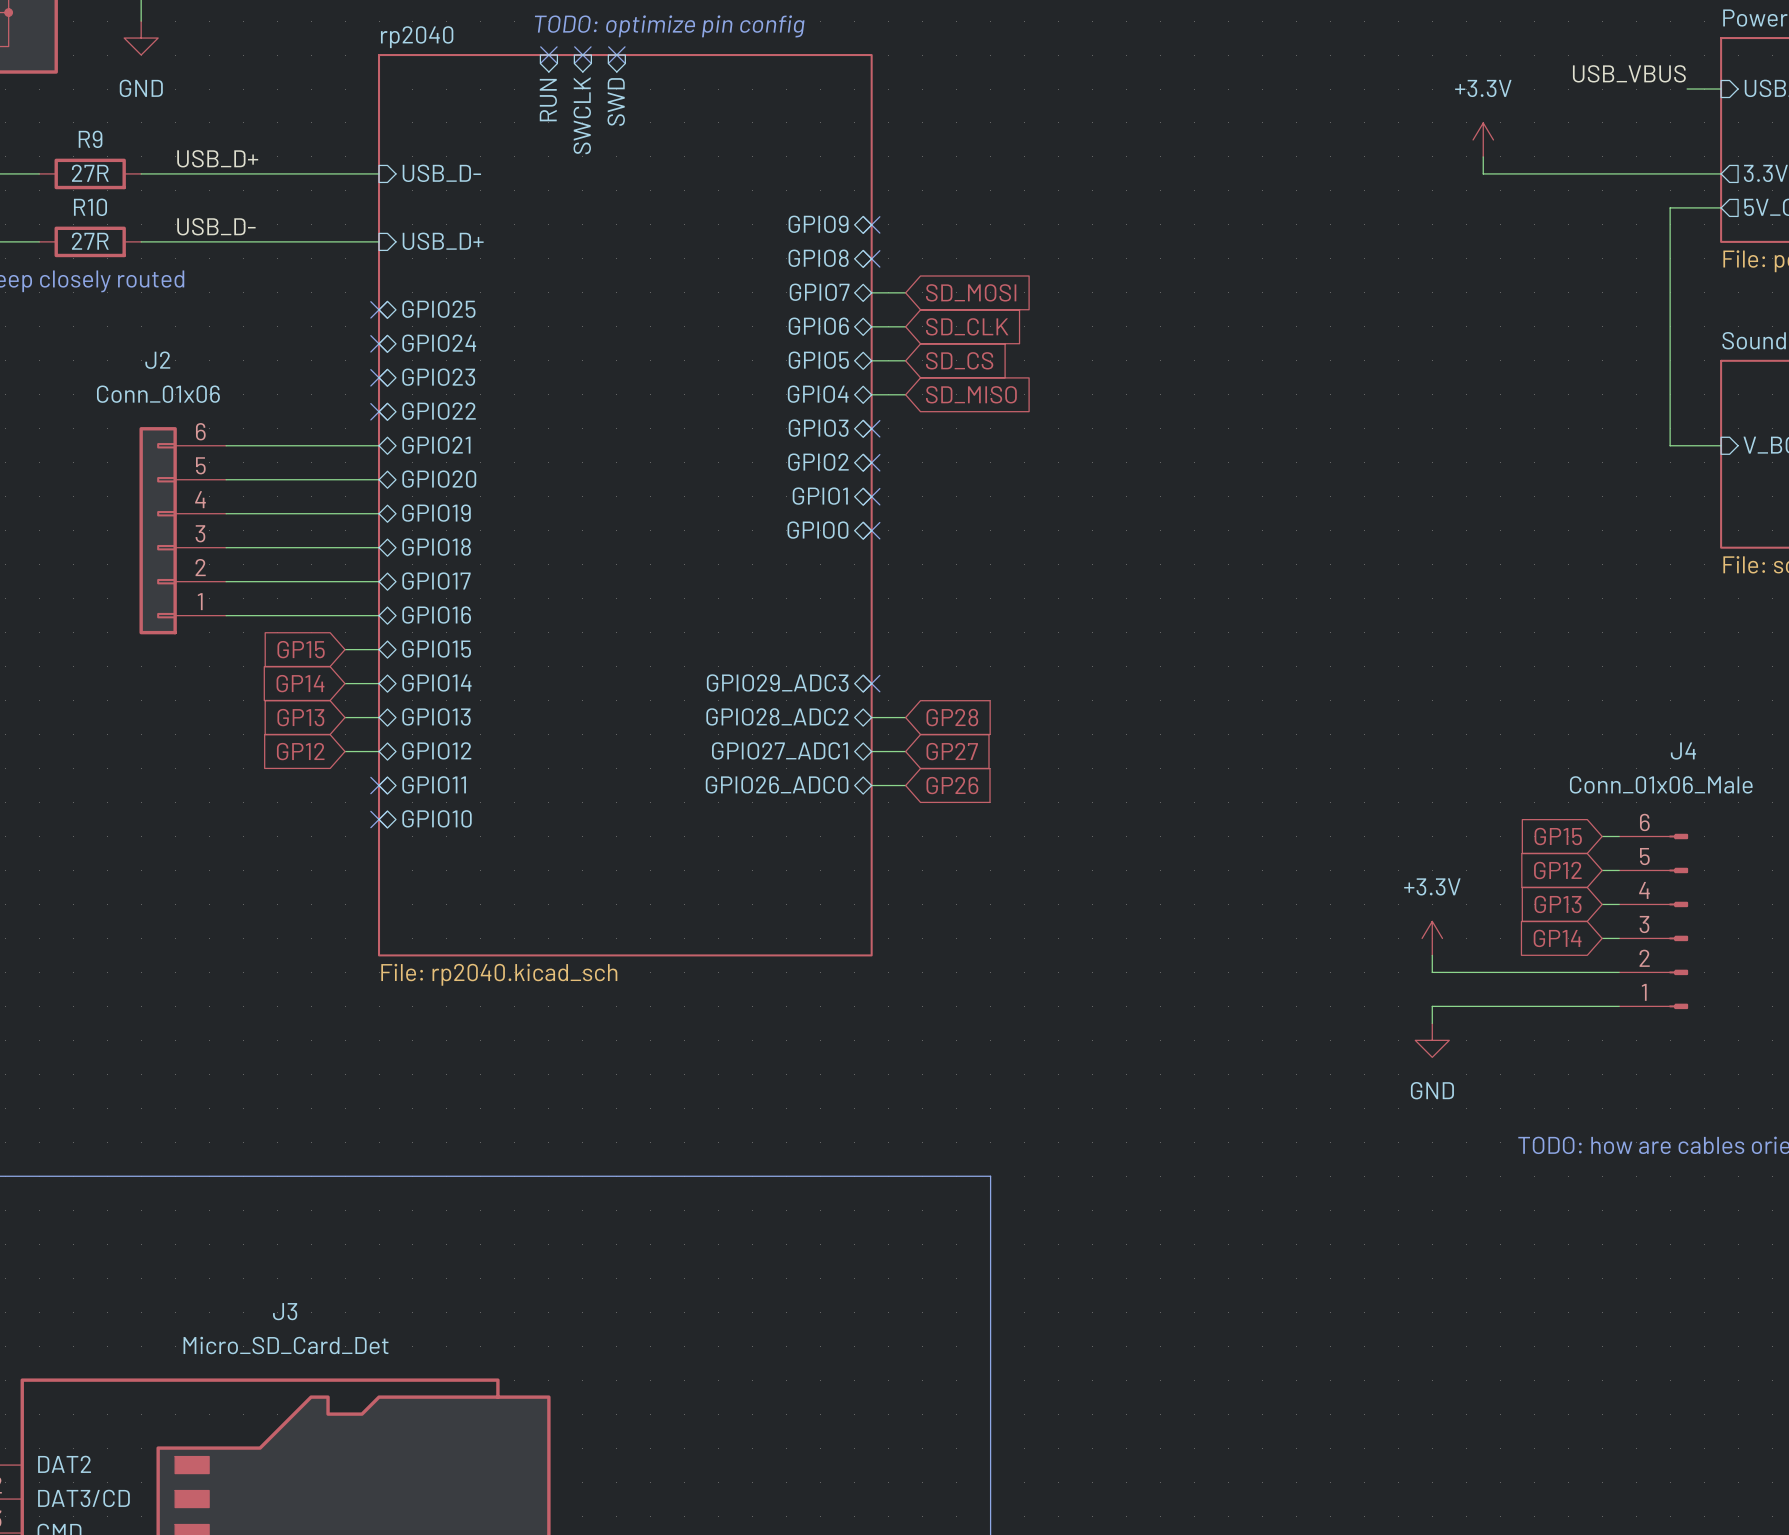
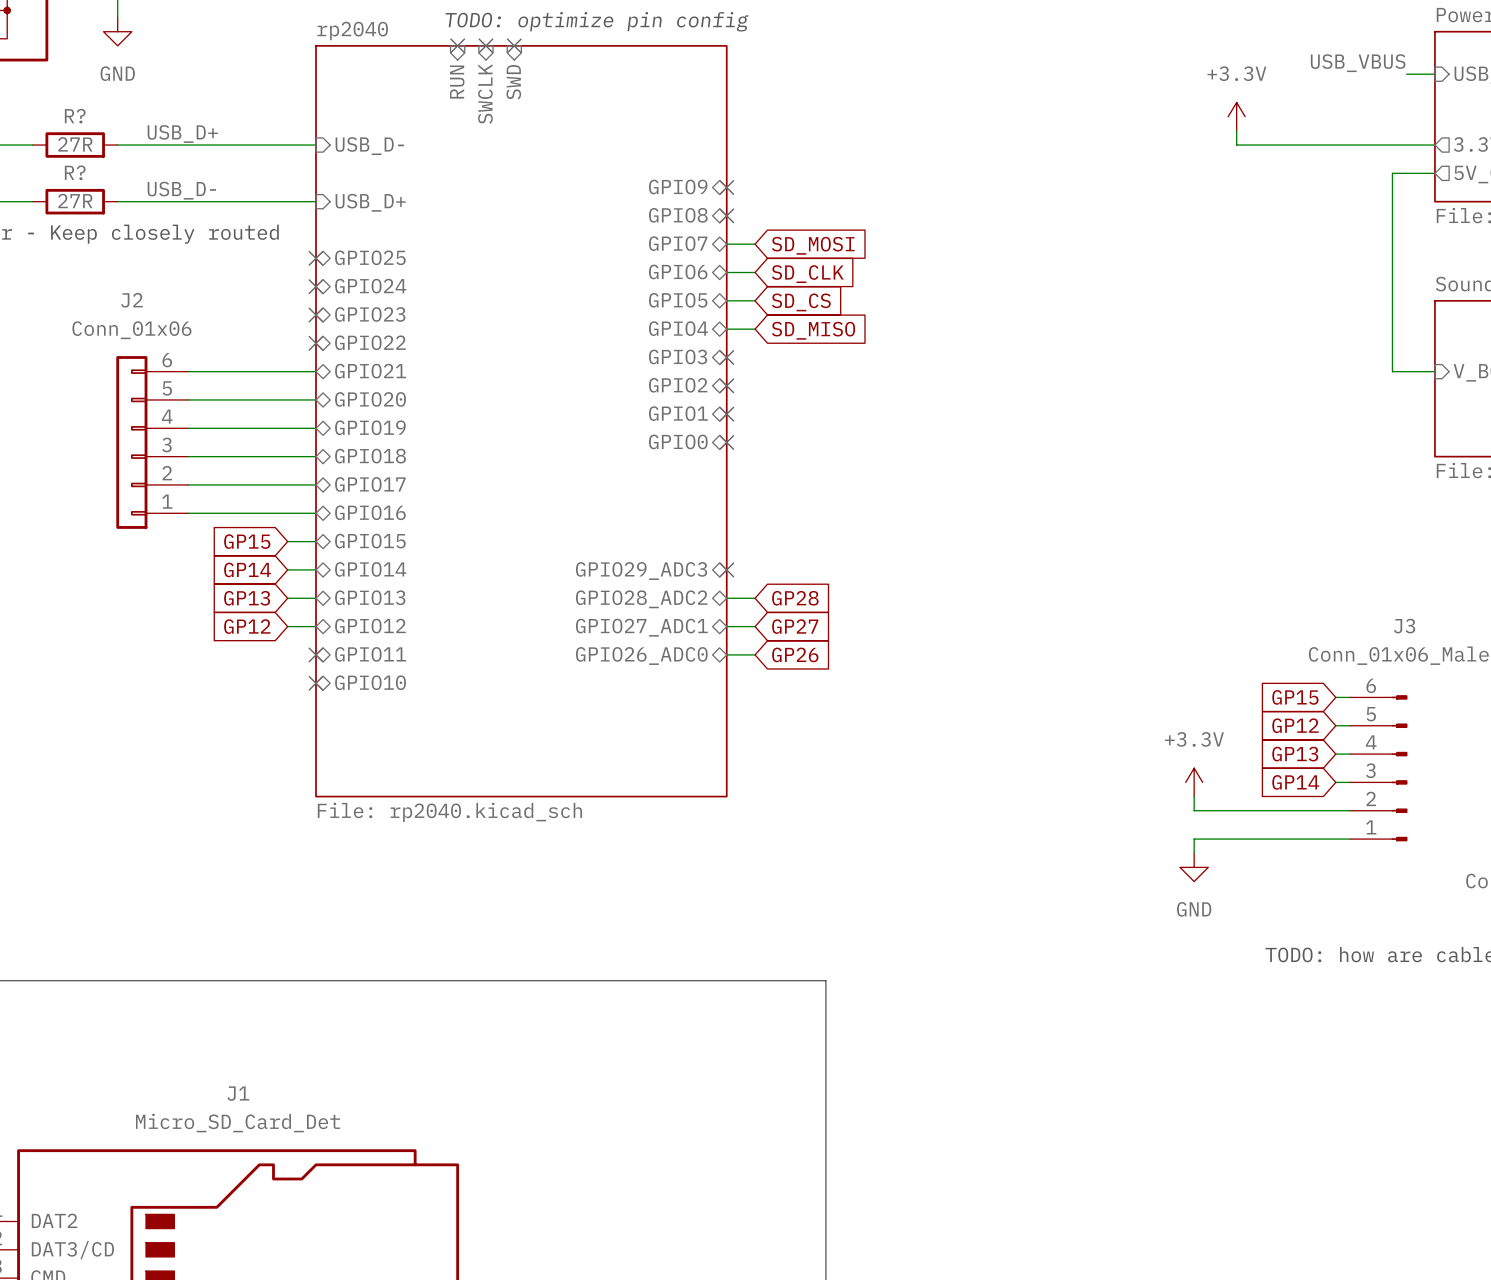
R9 name: R9 (90, 139) -> R? (75, 116)
R10 name: R10 (90, 207) -> R? (75, 172)
J4 name: J4 (1683, 751) -> J3 (1404, 626)
J3 name: J3 (285, 1311) -> J1 (238, 1093)

